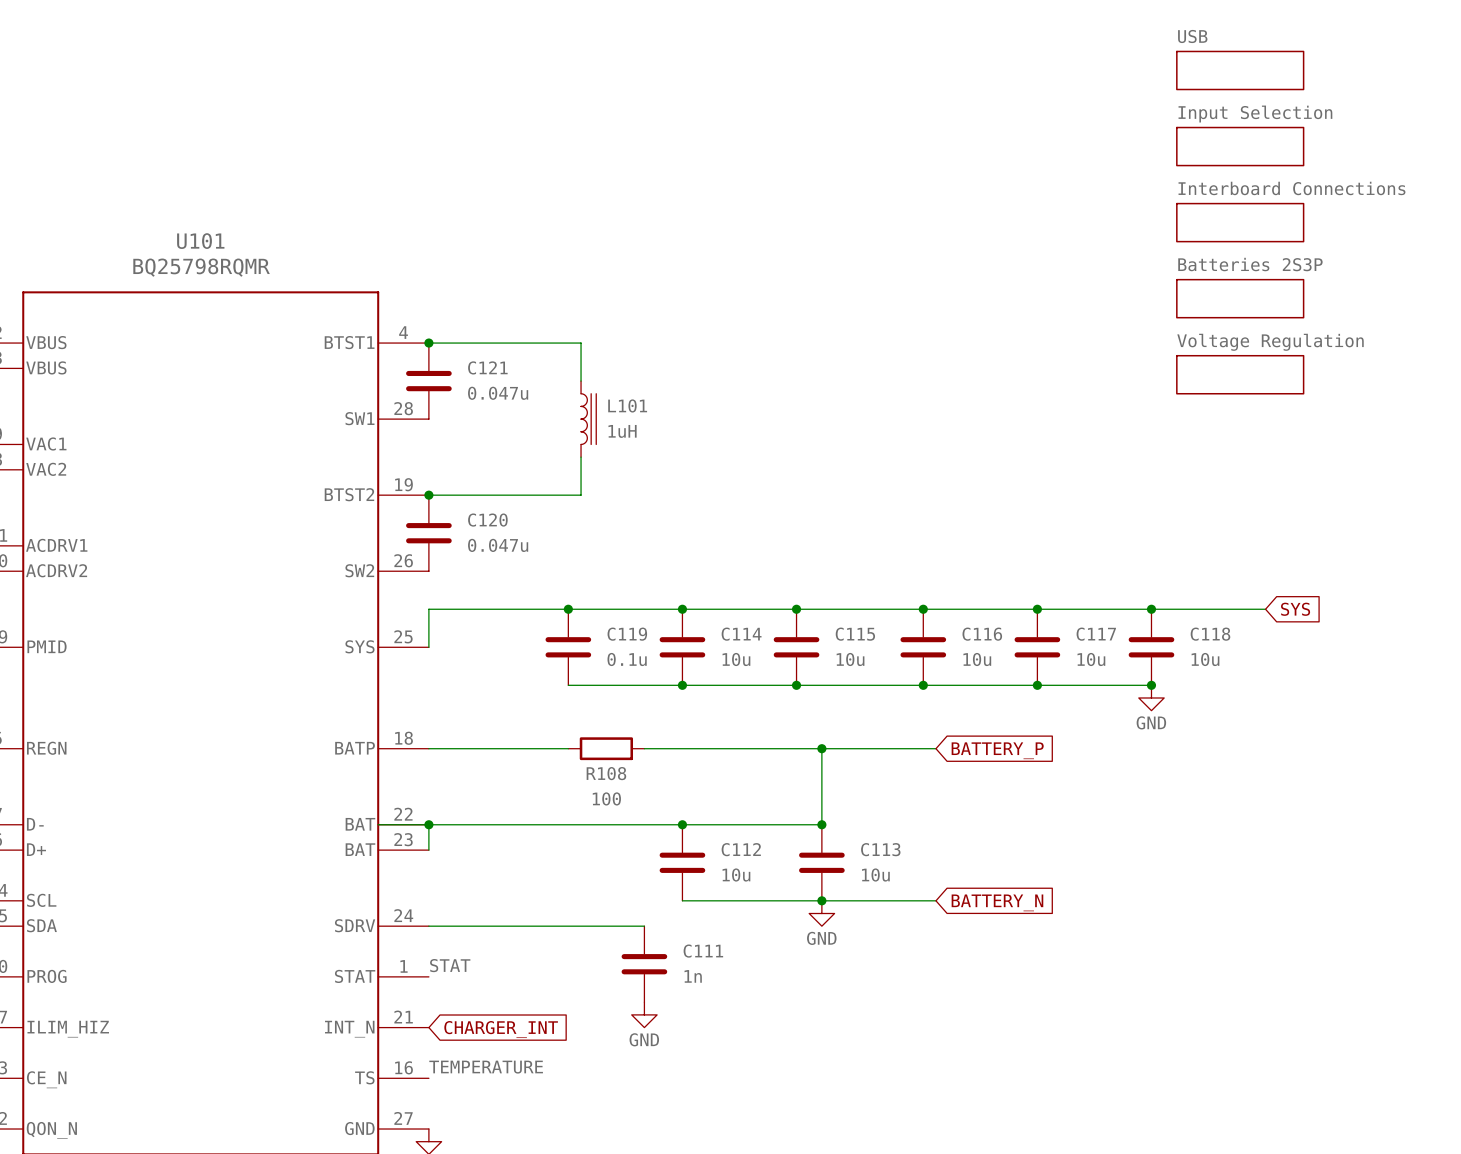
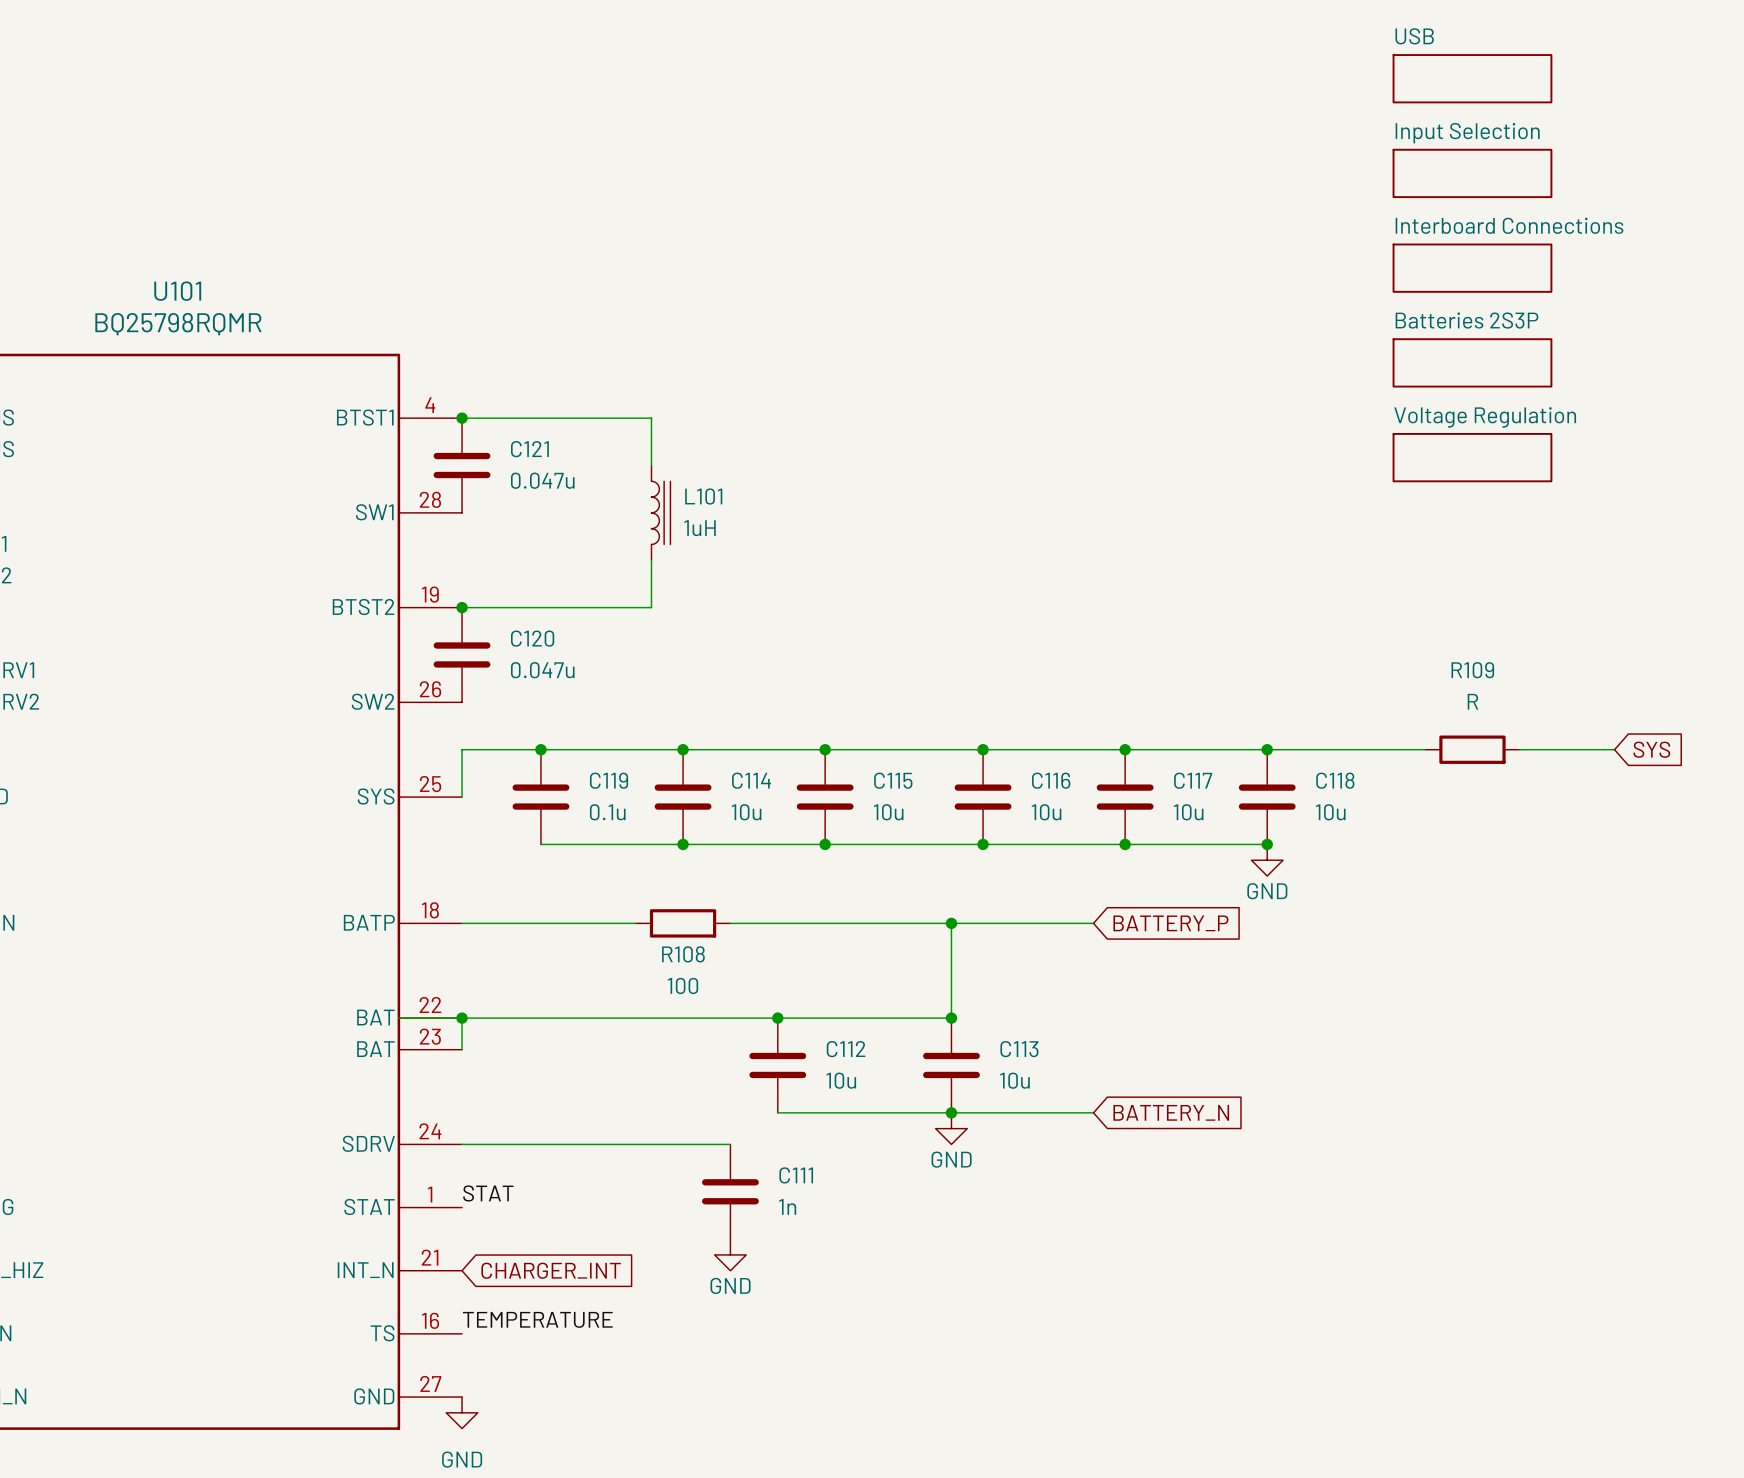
junction: none -> (540, 749)
junction: (568, 609) -> none
junction: none -> (683, 749)
junction: (682, 609) -> none
junction: none -> (825, 749)
junction: (796, 609) -> none
junction: none -> (983, 749)
junction: (923, 609) -> none
junction: none -> (1125, 749)
junction: (1037, 609) -> none
junction: none -> (1267, 749)
junction: (1151, 609) -> none
wire: (1202, 609) (1265, 609) -> none
R109: none -> R (1472, 749)
global label position: SYS (1295, 609) -> SYS (1651, 749)
C119 position: (568, 647) -> (540, 797)
C114 position: (682, 647) -> (683, 797)
C115 position: (796, 647) -> (825, 797)
C116 position: (923, 647) -> (983, 797)
C117 position: (1037, 647) -> (1125, 797)
C118 position: (1151, 647) -> (1267, 797)
wire: none -> (540, 844) (635, 844)
junction: none -> (683, 844)
junction: (682, 685) -> none
junction: none -> (825, 844)
junction: (796, 685) -> none
junction: none -> (983, 844)
junction: (923, 685) -> none
junction: none -> (1125, 844)
junction: (1037, 685) -> none
wire: (1075, 685) (1151, 685) -> (1519, 749) (1614, 749)
junction: none -> (1267, 844)
junction: (1151, 685) -> none
power symbol position: GND (1151, 697) -> GND (1267, 860)

